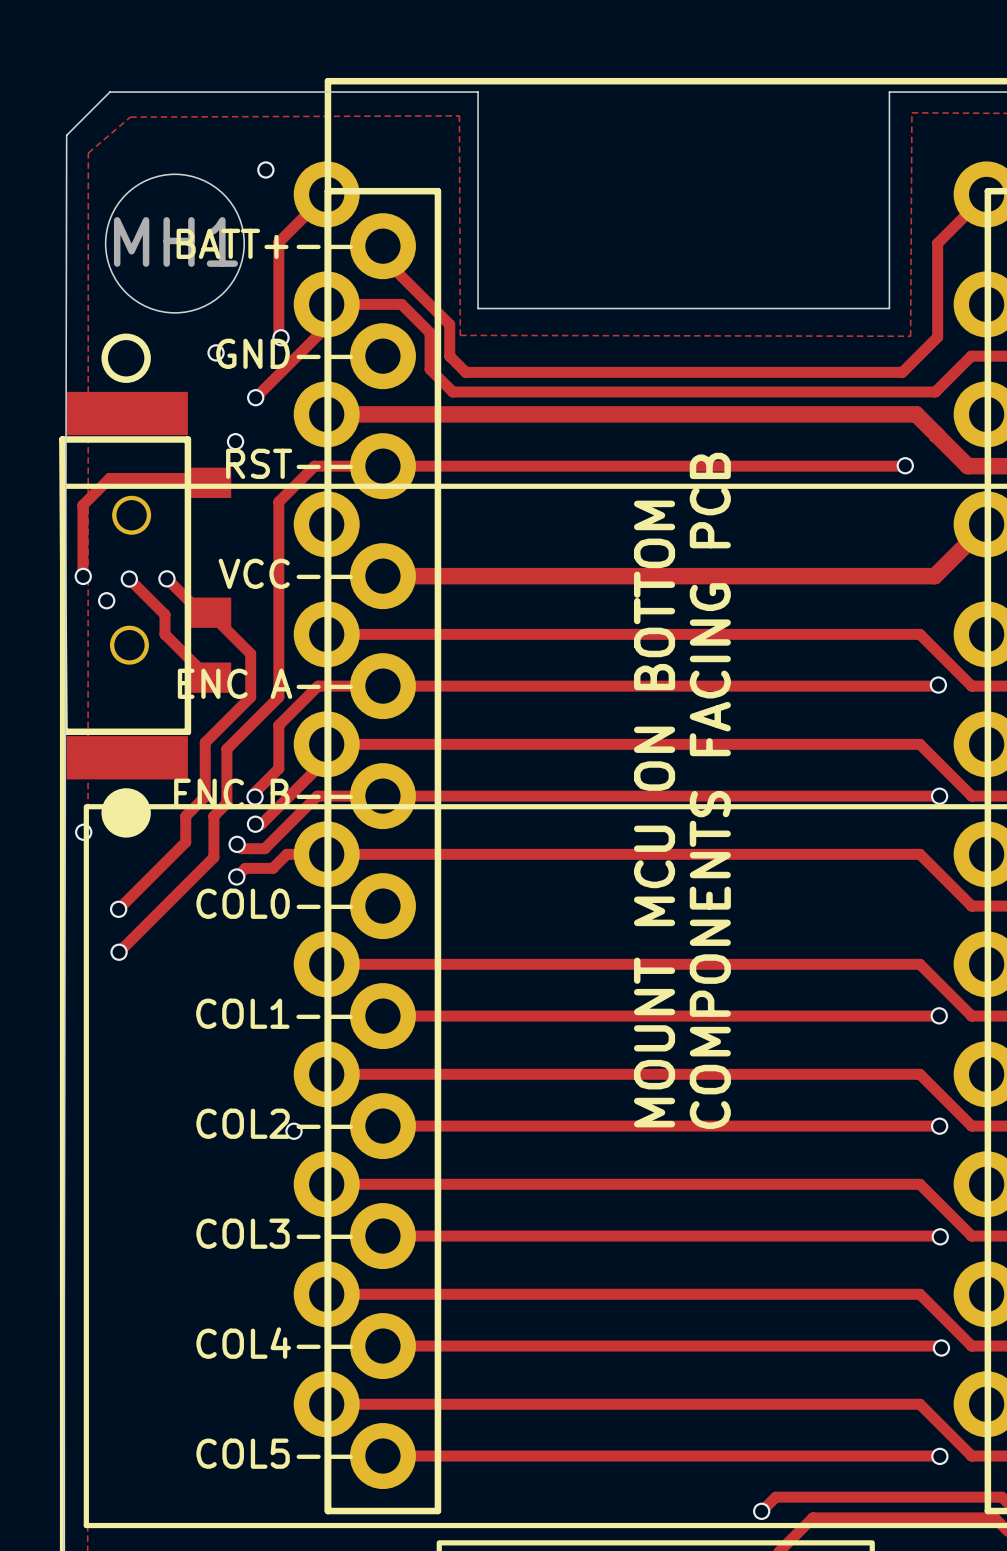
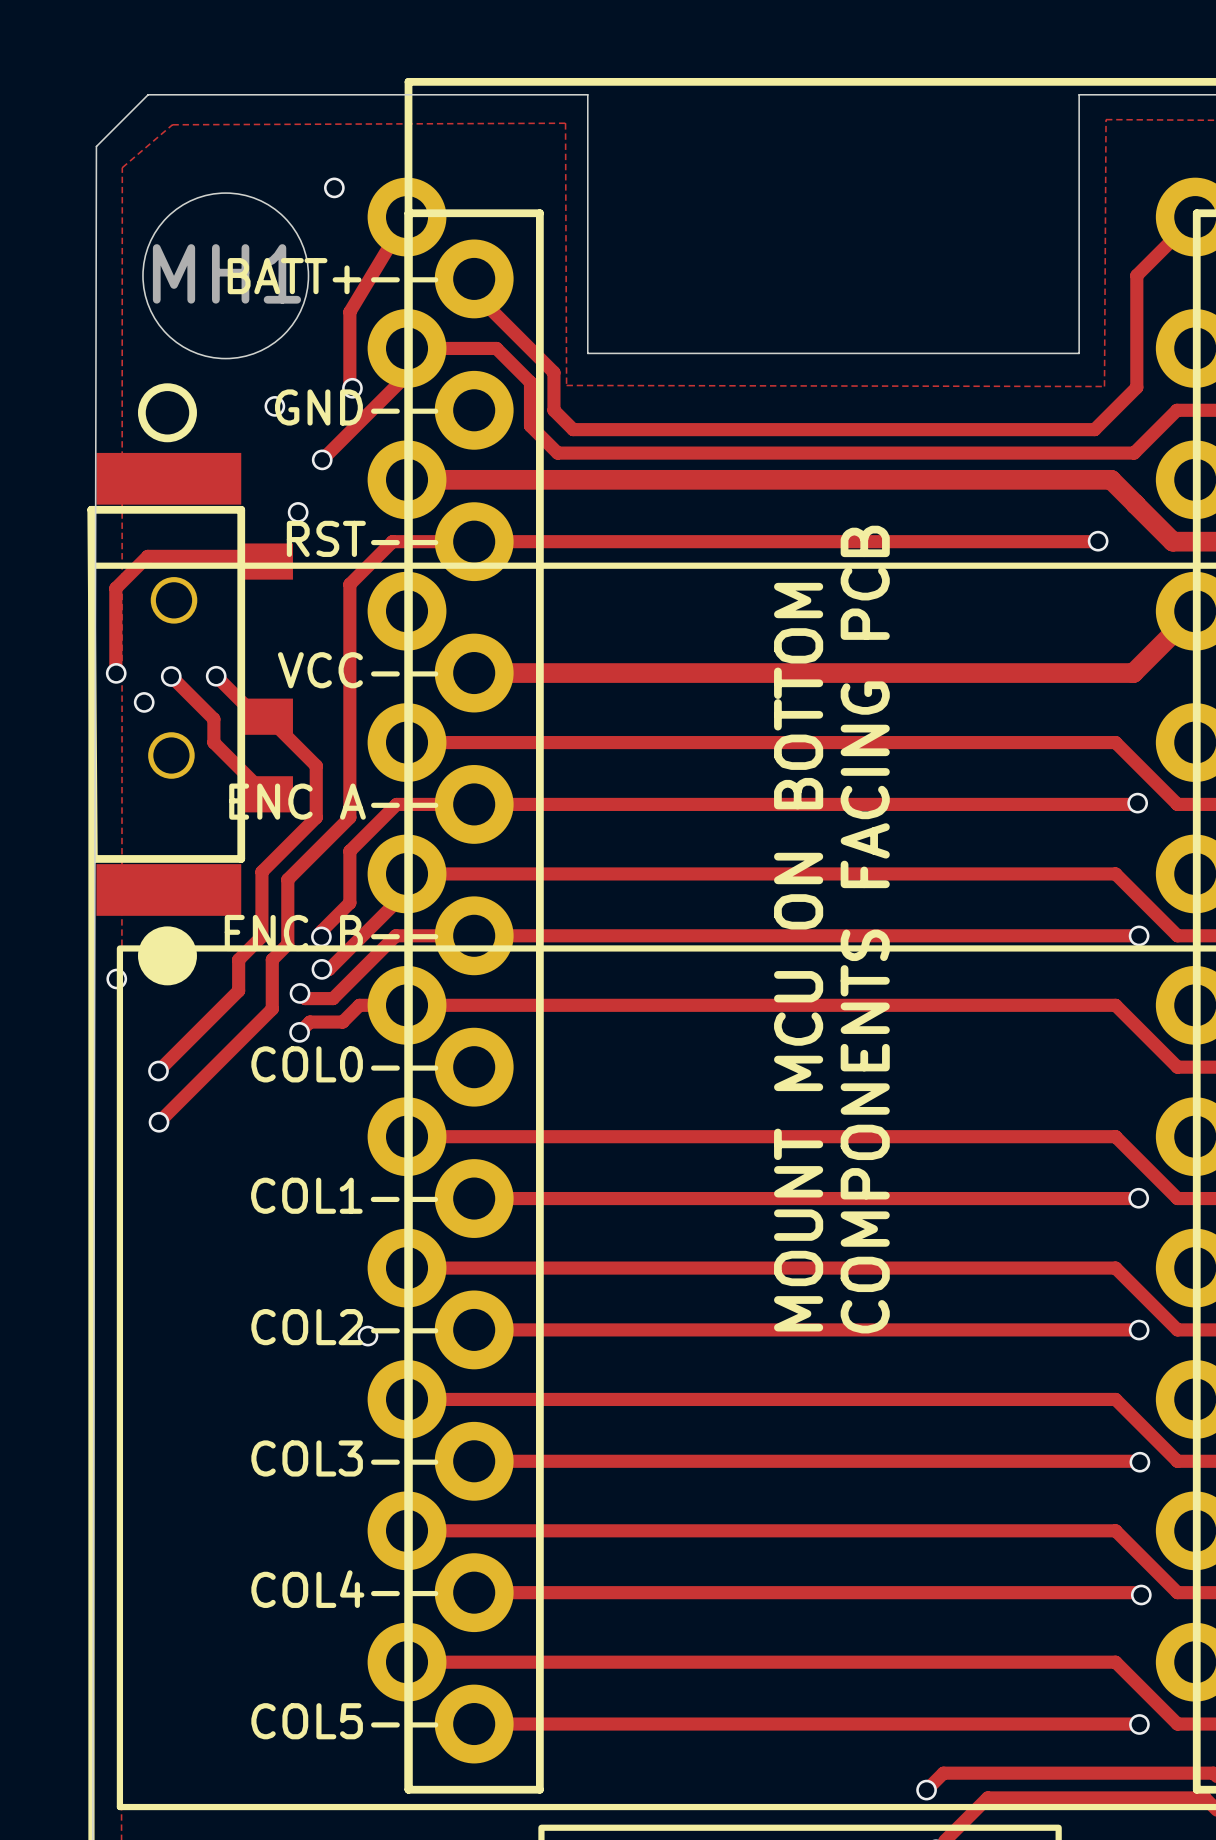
track: (326, 194) (278, 242) (278, 273) -> (407, 217) (349, 312)

